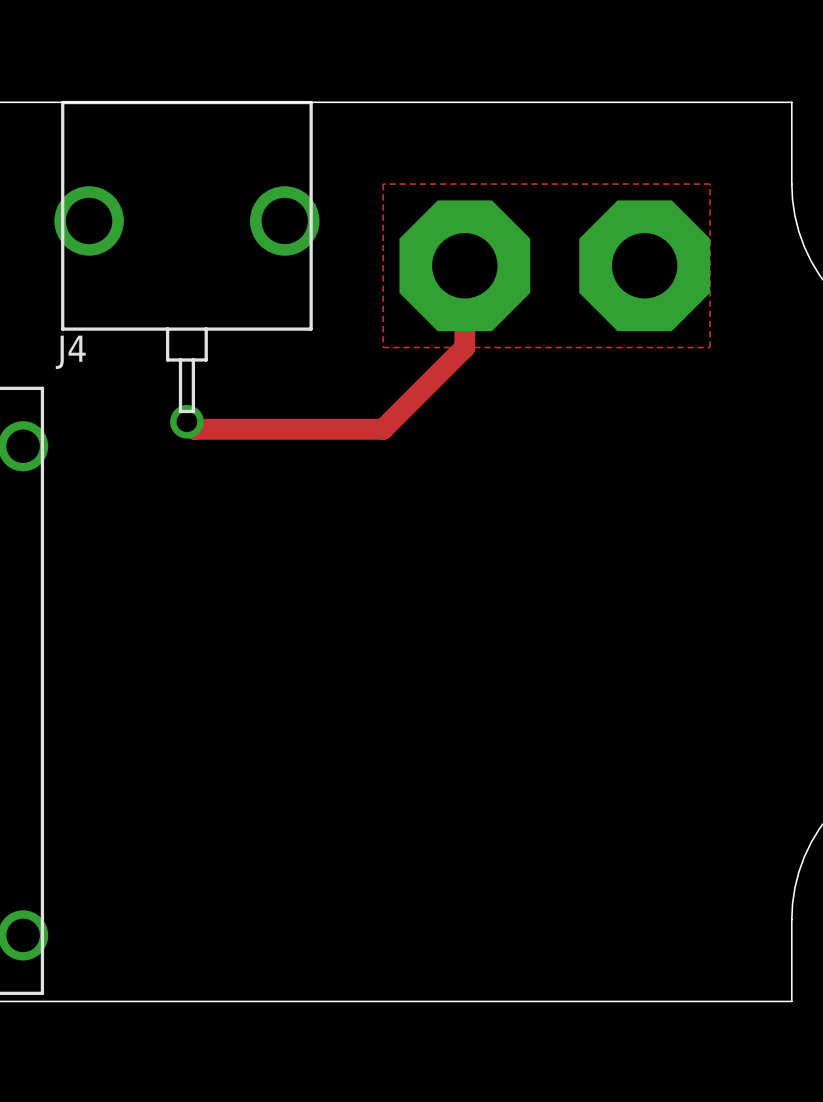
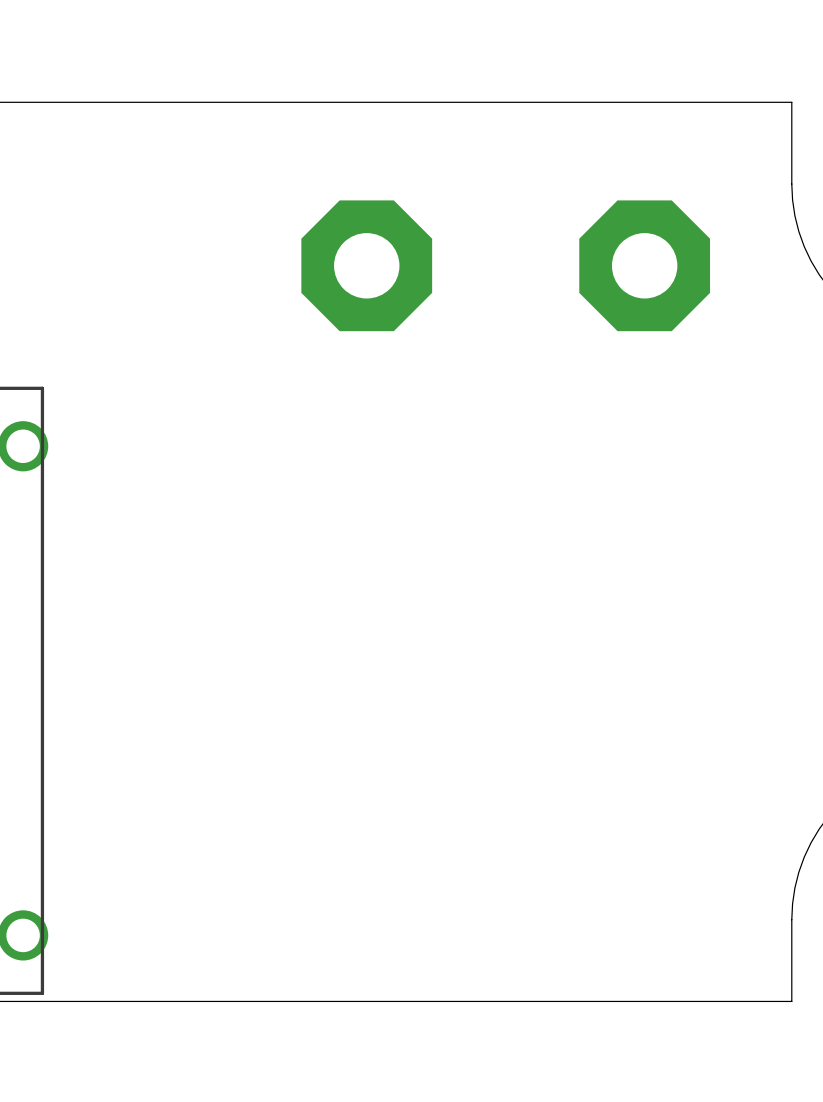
zone outline: (383, 184) (383, 347) (710, 347) (710, 184) (383, 184) -> none
track: (464, 265) (464, 347) (383, 429) (194, 429) (186, 421) -> none
part position: (464, 265) -> (366, 265)
J4: (186, 269) -> none

